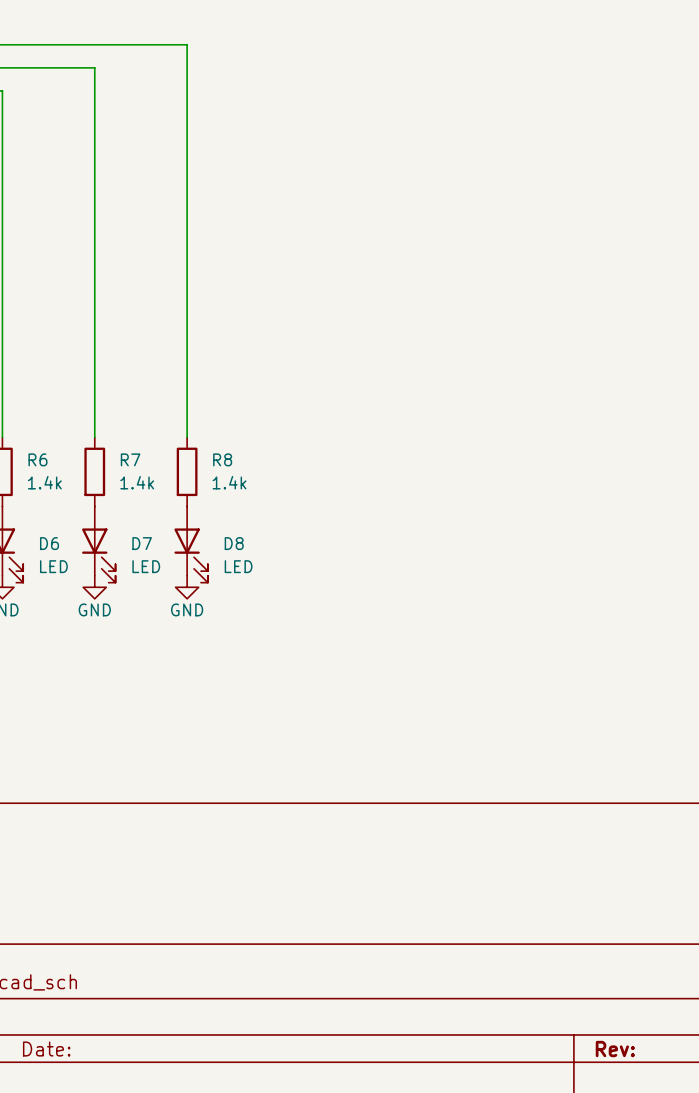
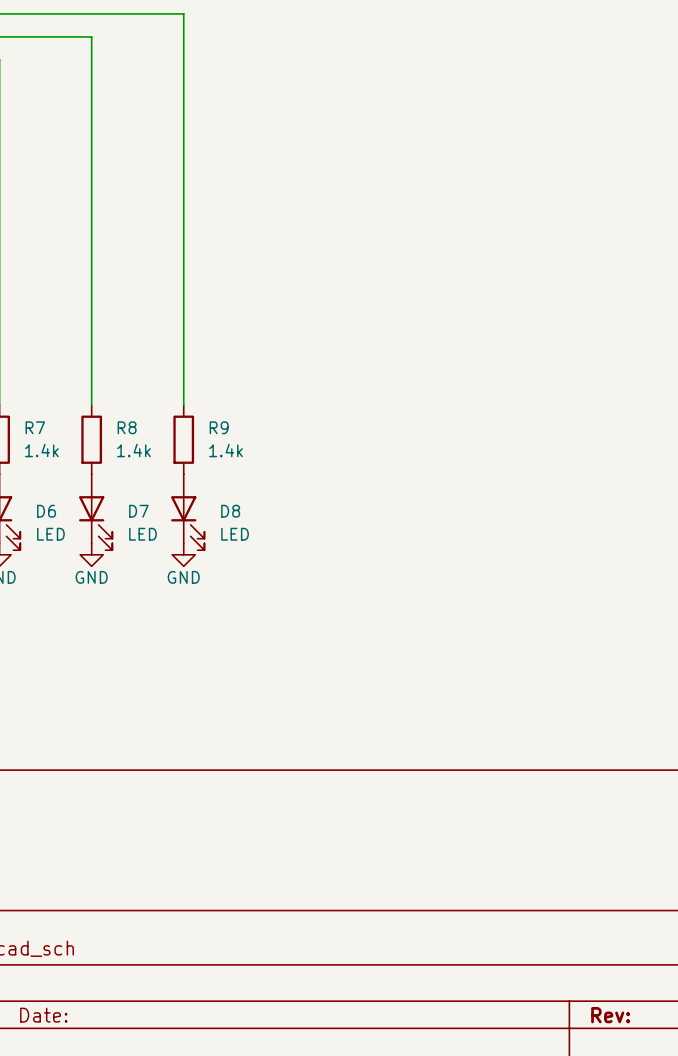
R6 name: R6 (37, 459) -> R7 (35, 427)
R7 name: R7 (130, 459) -> R8 (127, 427)
R8 name: R8 (222, 459) -> R9 (219, 427)

